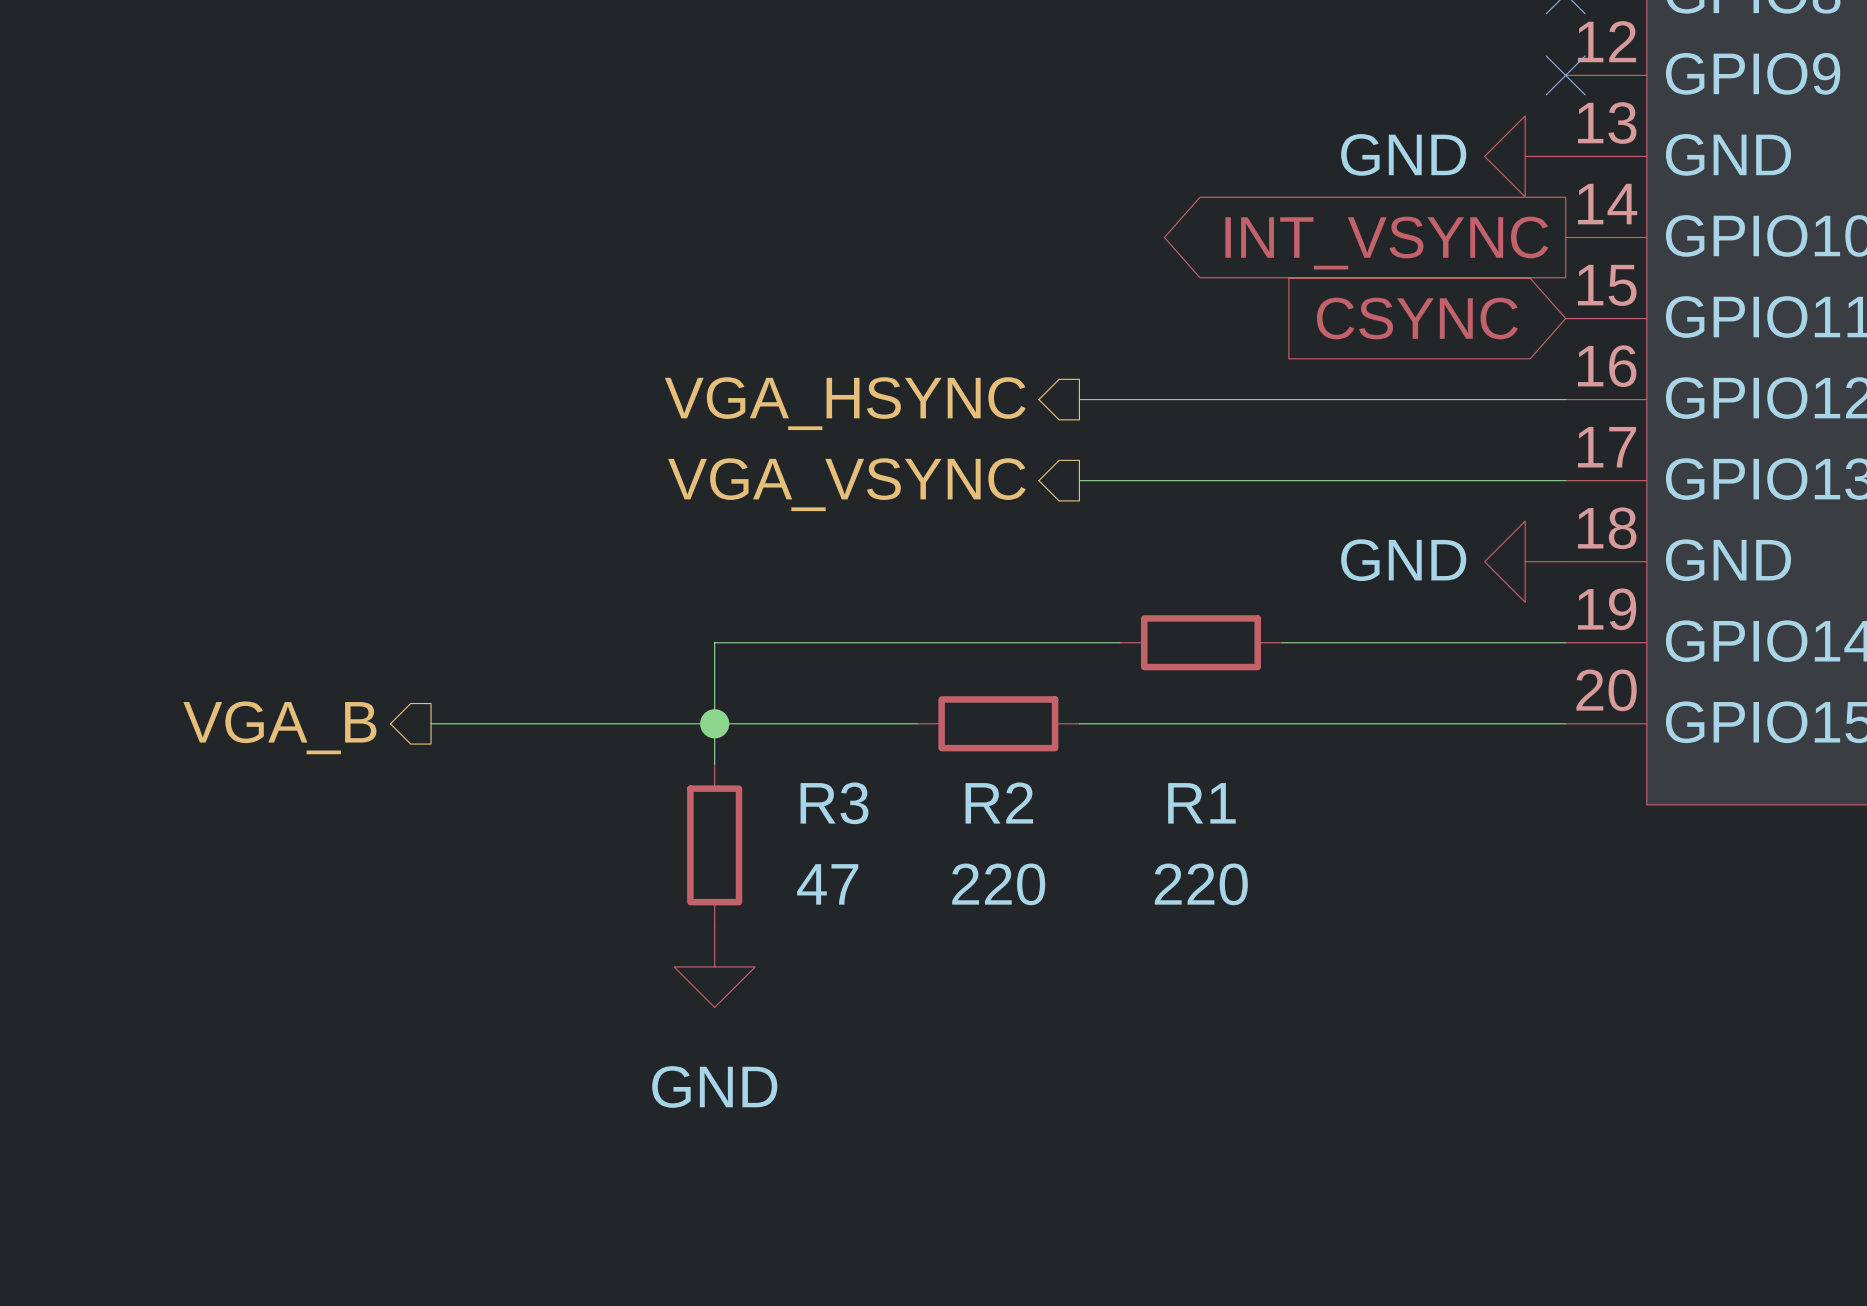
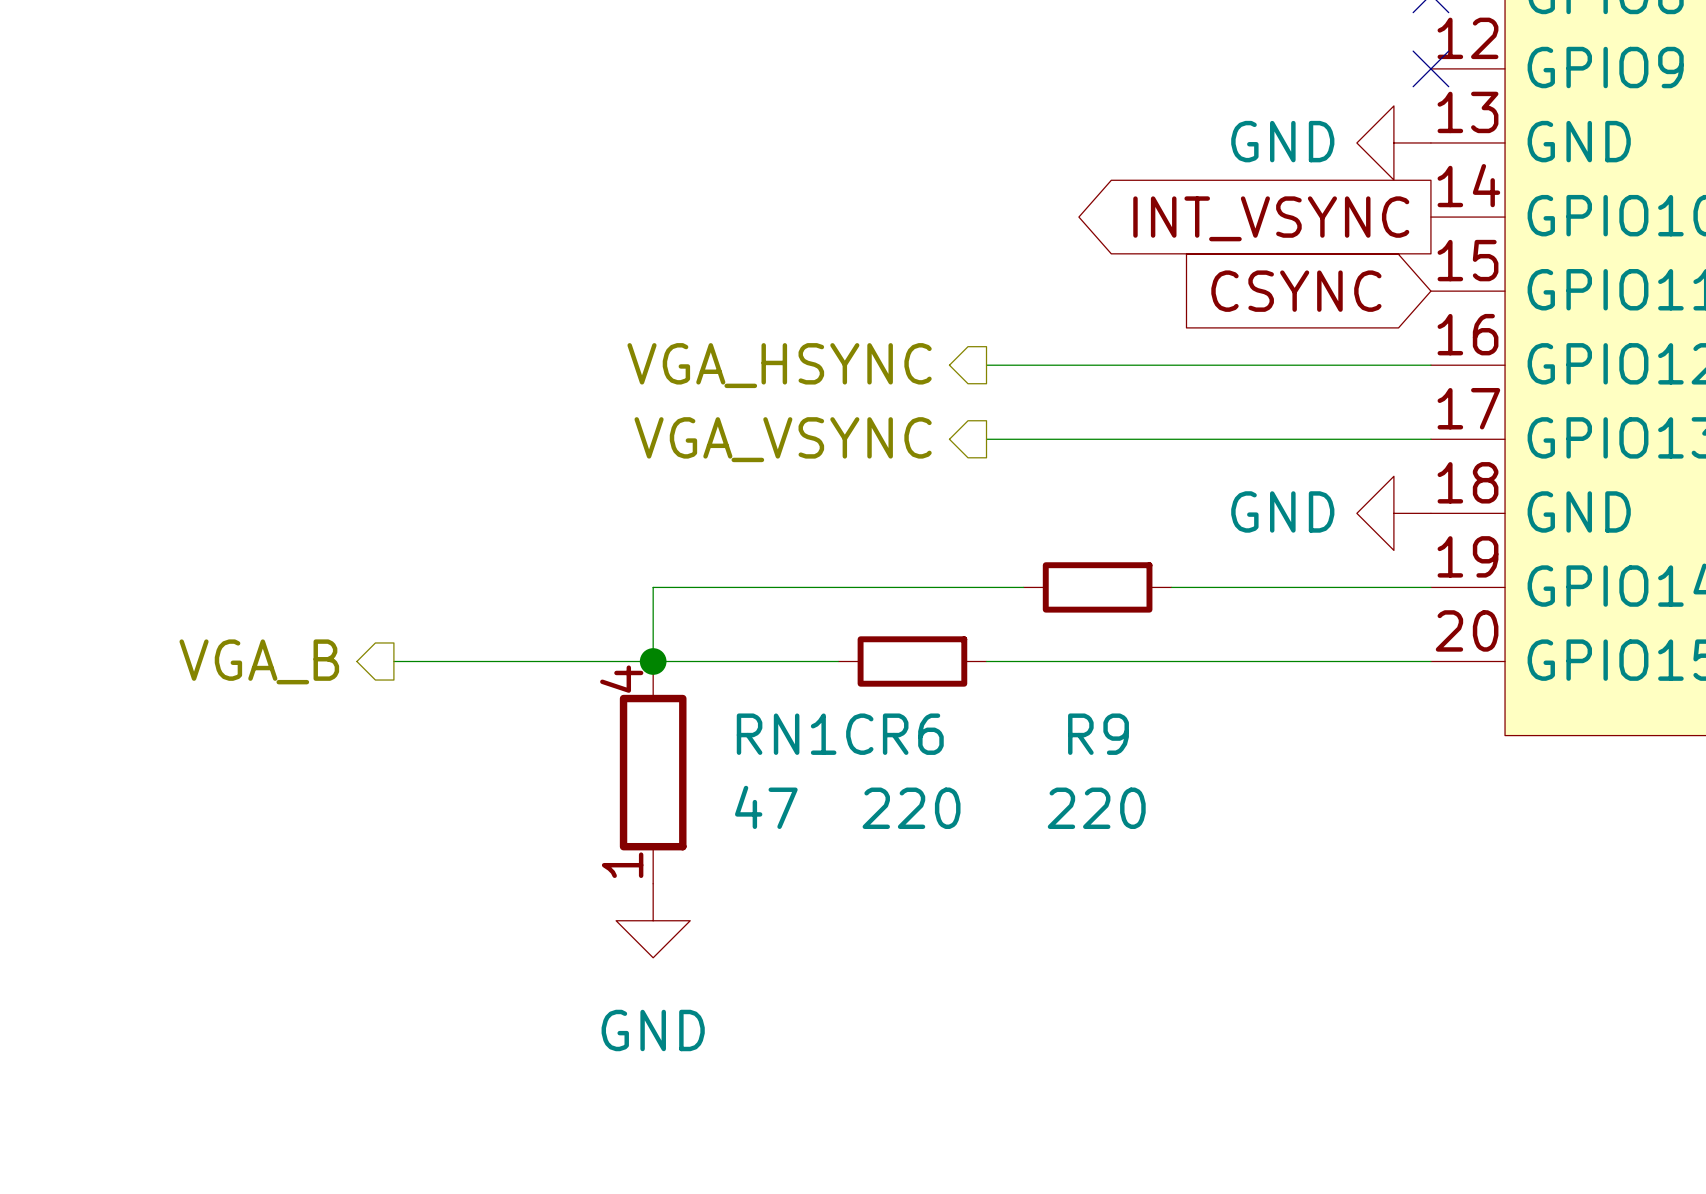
R2 name: R2 (999, 803) -> R6 (913, 734)
R1 name: R1 (1201, 803) -> R9 (1098, 734)
R3: 47 (714, 845) -> none
RN1C: none -> 47 (653, 772)
power symbol position: GND (714, 966) -> GND (653, 920)

